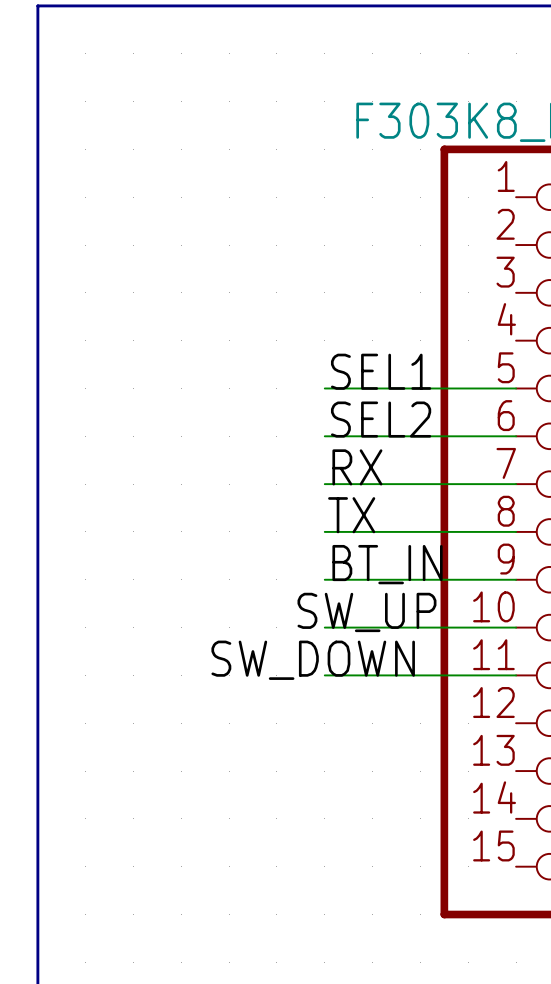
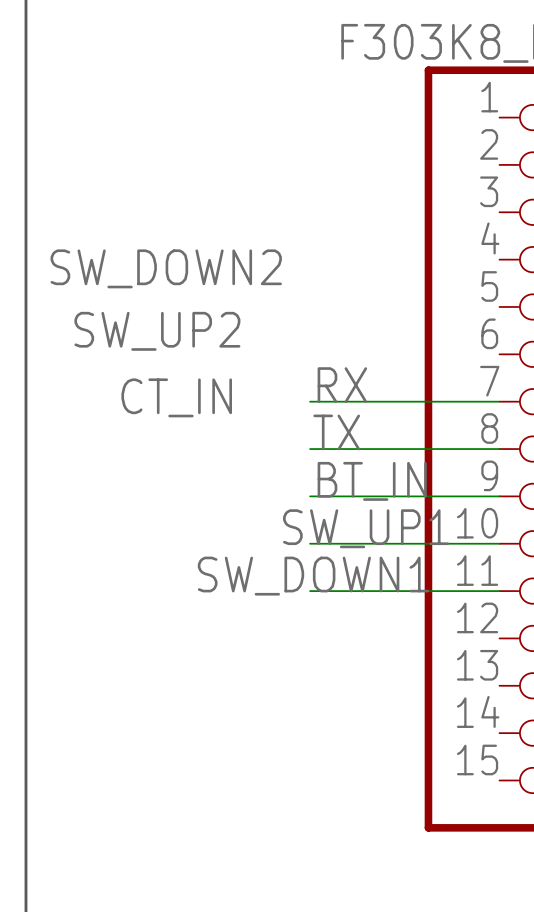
text: none -> SW_DOWN2 (166, 268)
label: SEL1 (381, 371) -> none
wire: (324, 388) (516, 388) -> none
text: none -> SW_UP2 (157, 331)
label: SEL2 (381, 419) -> none
wire: (324, 436) (516, 436) -> none
text: none -> CT_IN (176, 397)
label: SW_UP (366, 612) -> SW_UP1 (366, 528)
label: SW_DOWN (313, 660) -> SW_DOWN1 (313, 576)

